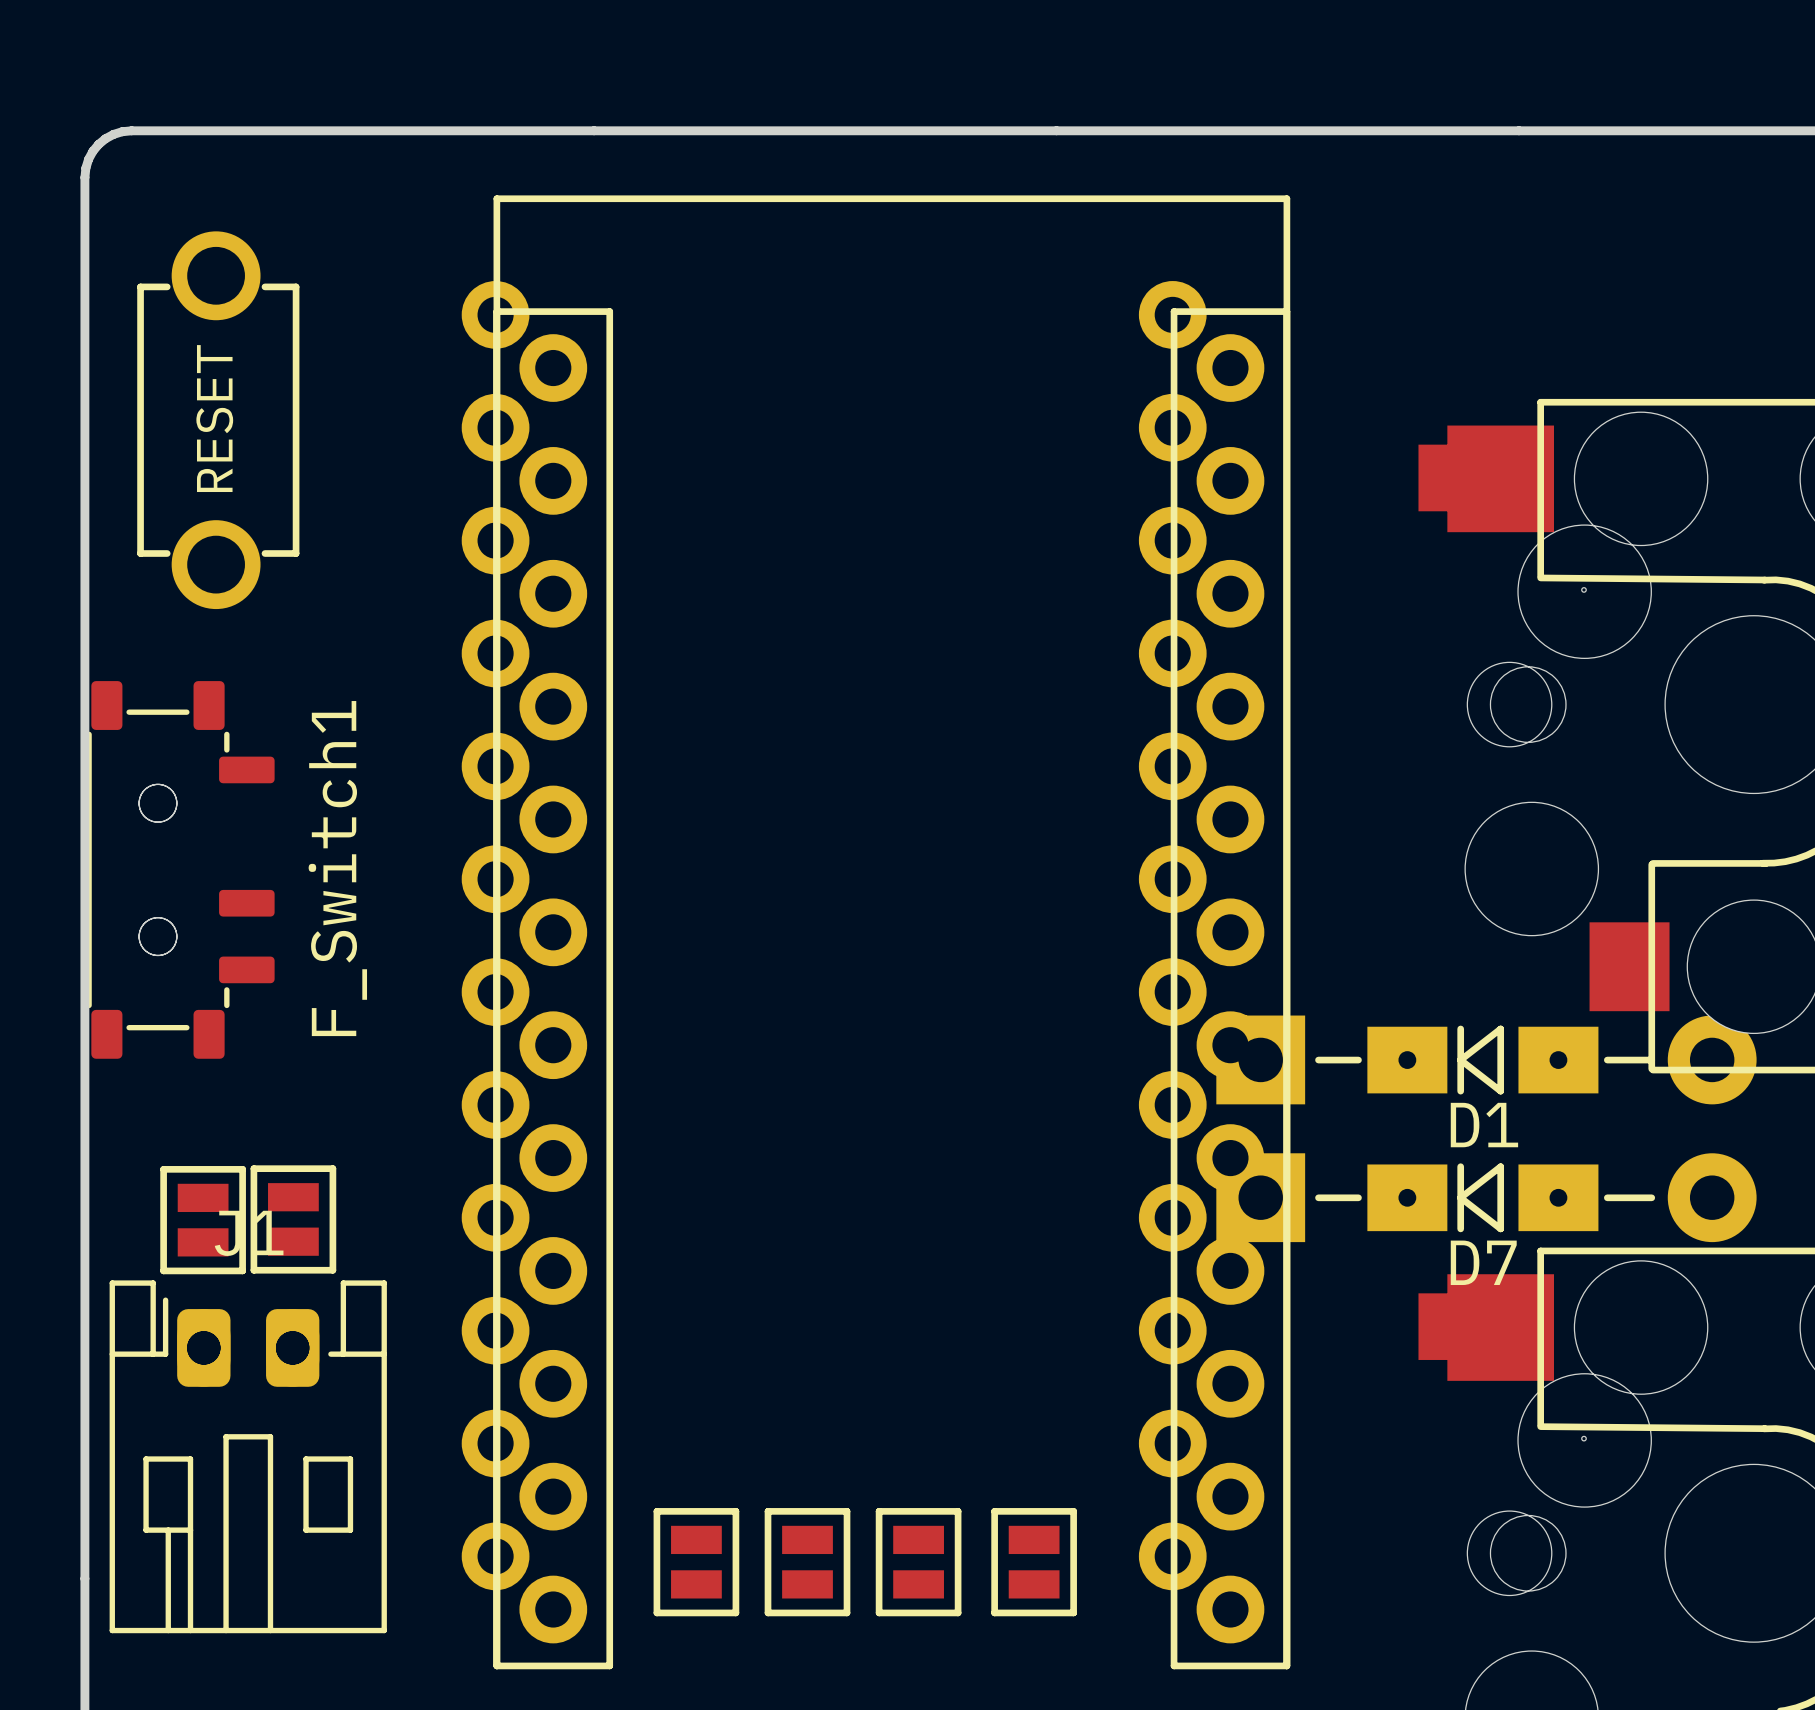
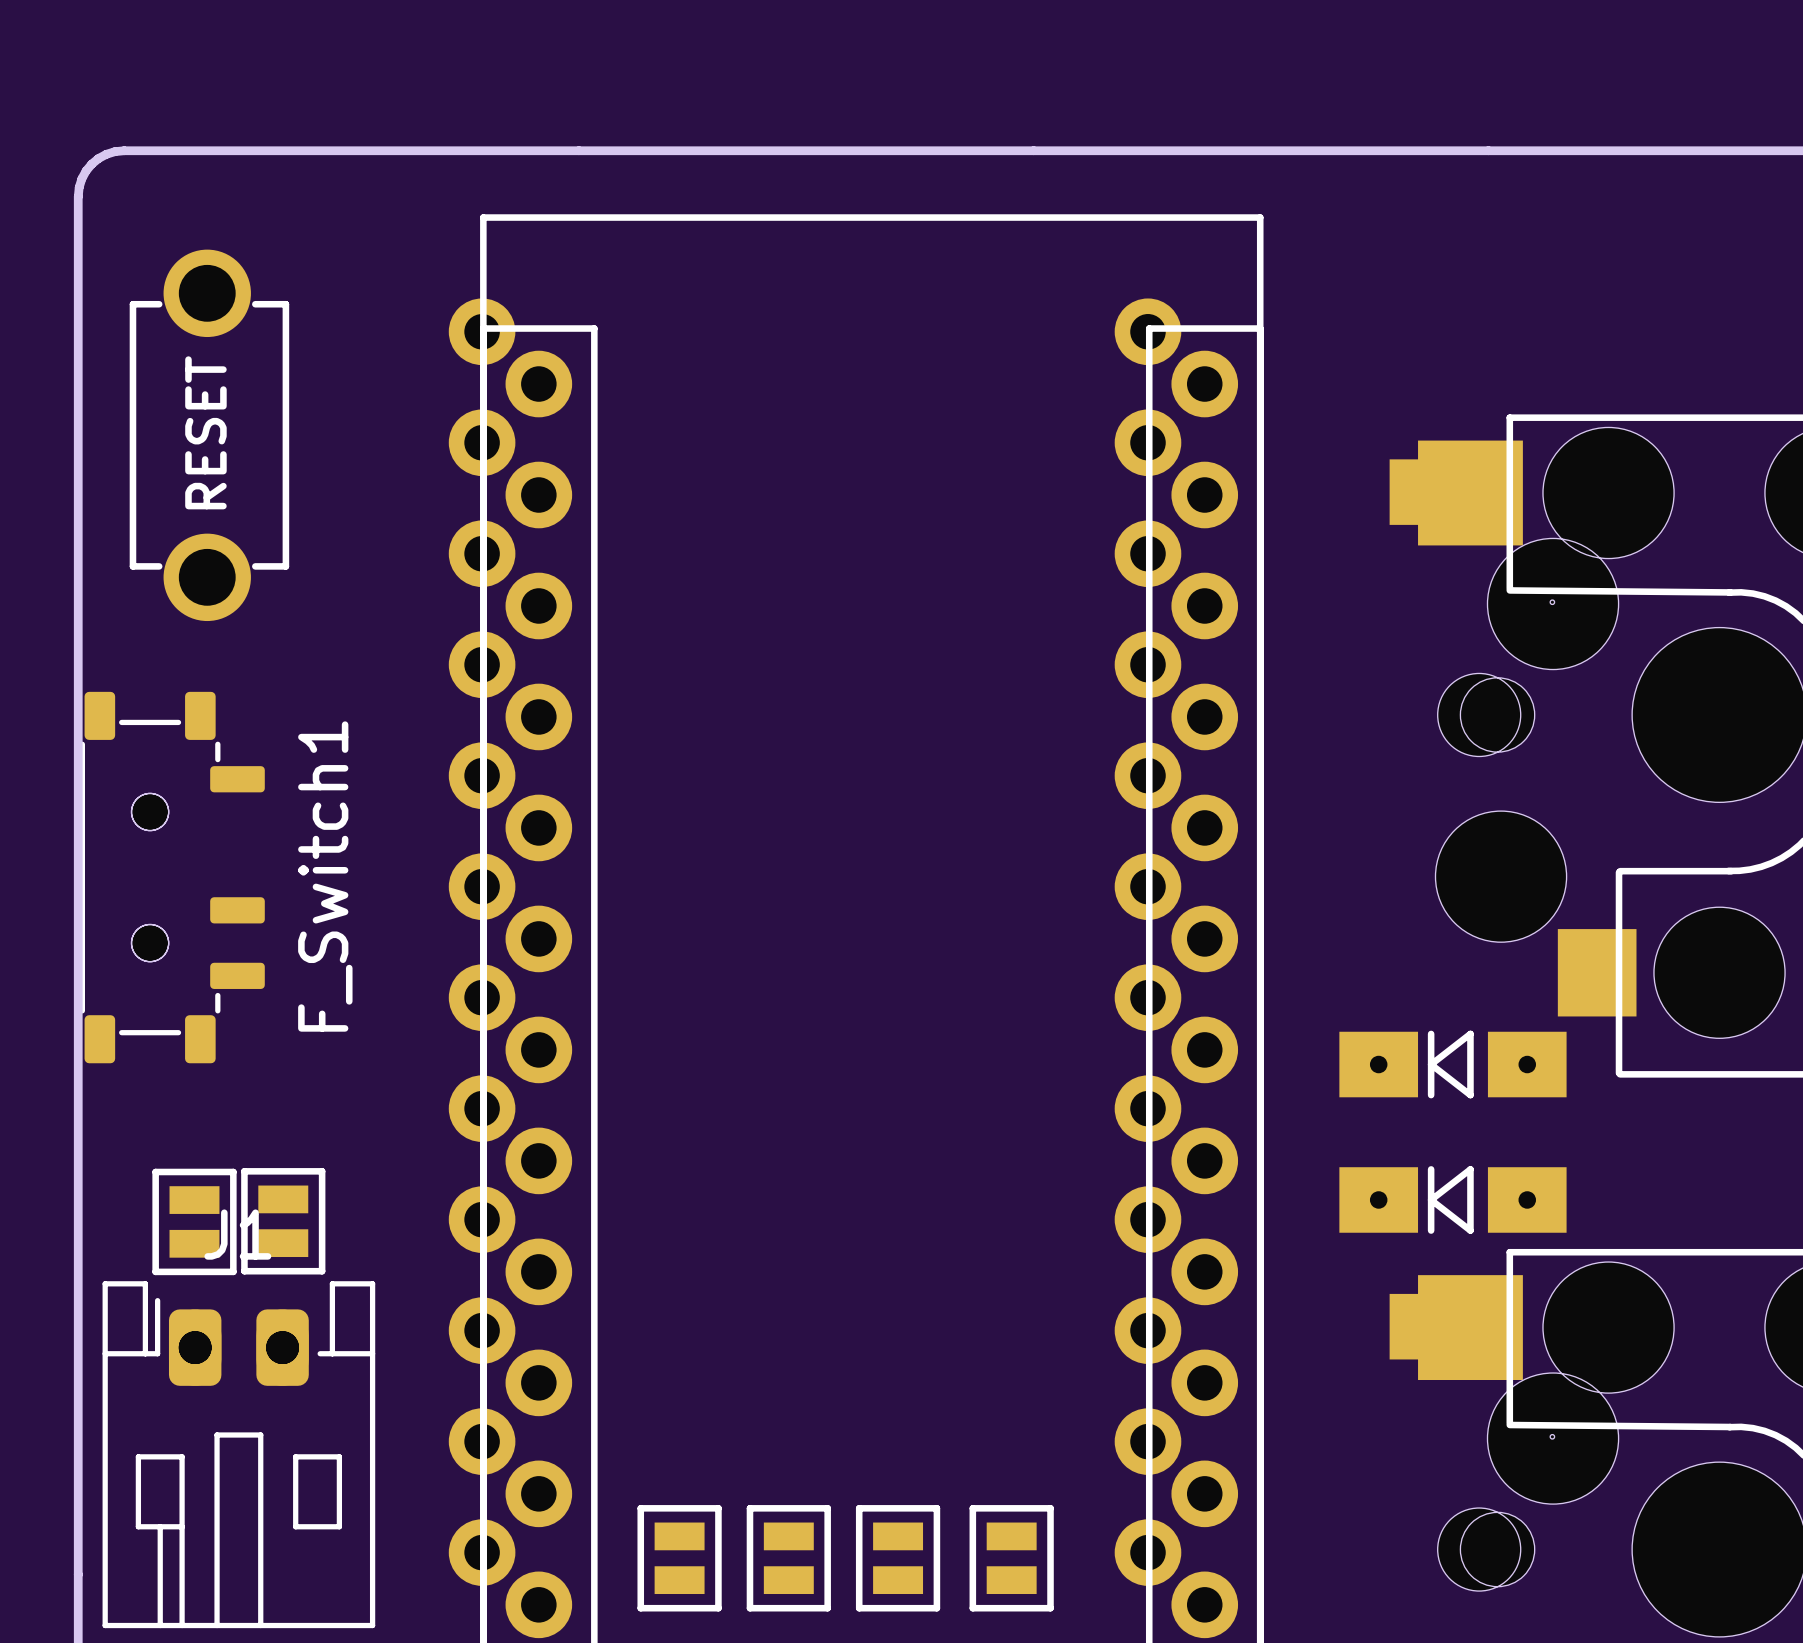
D1: (1486, 1059) -> none
D7: (1486, 1197) -> none

